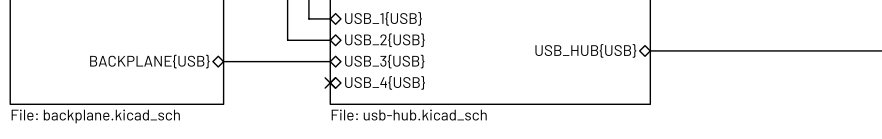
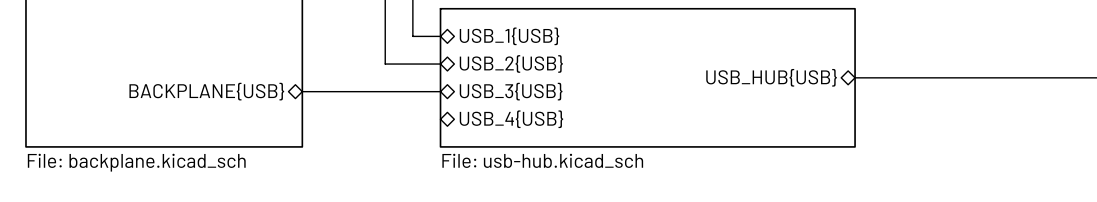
no-connect mark: (330, 82) -> none

